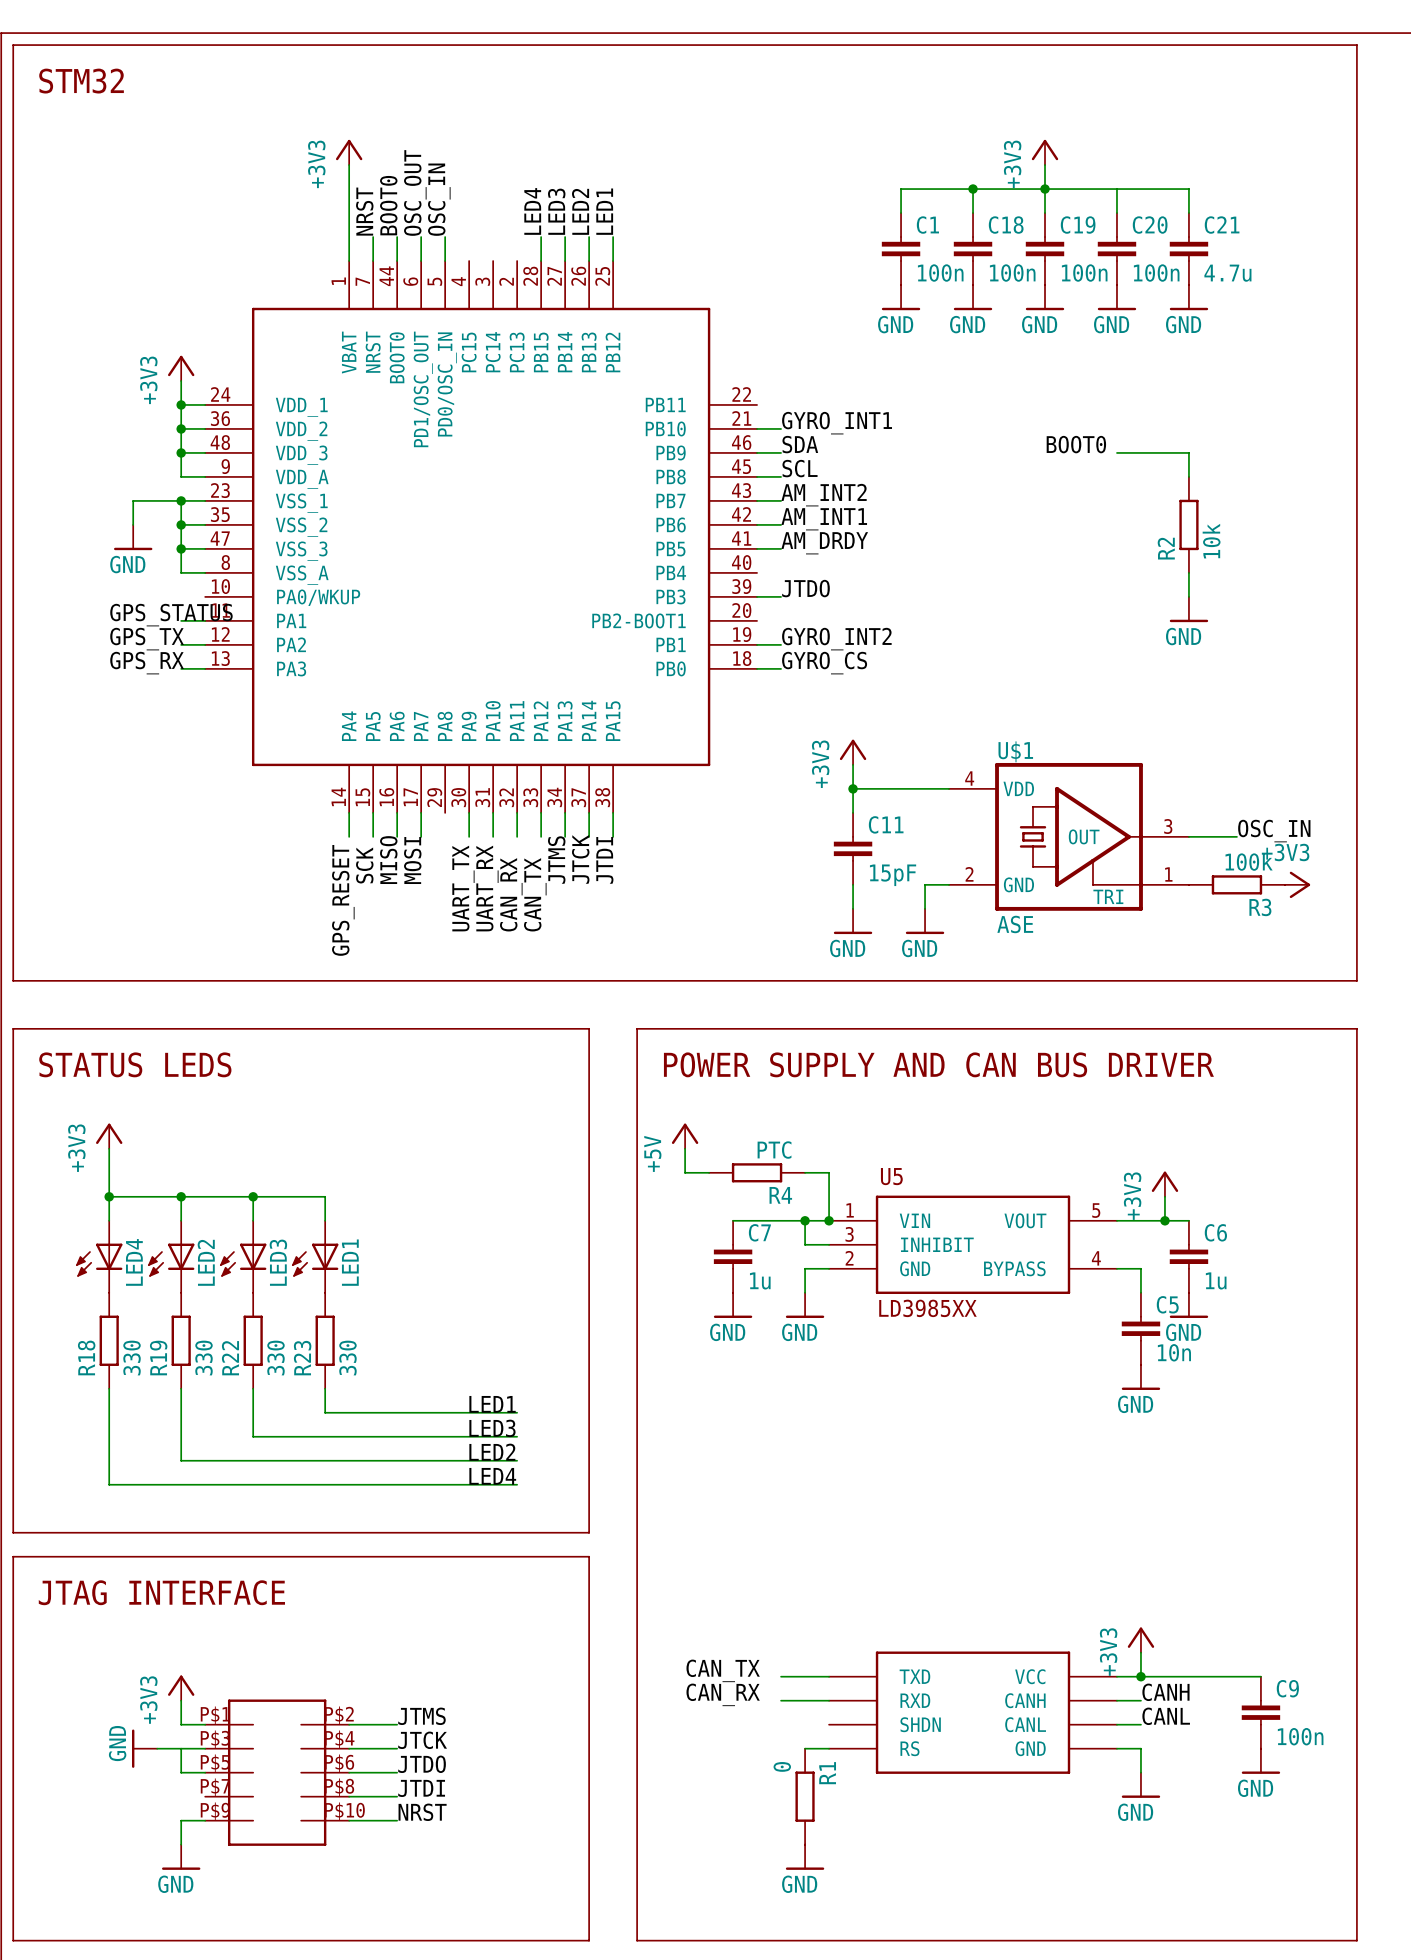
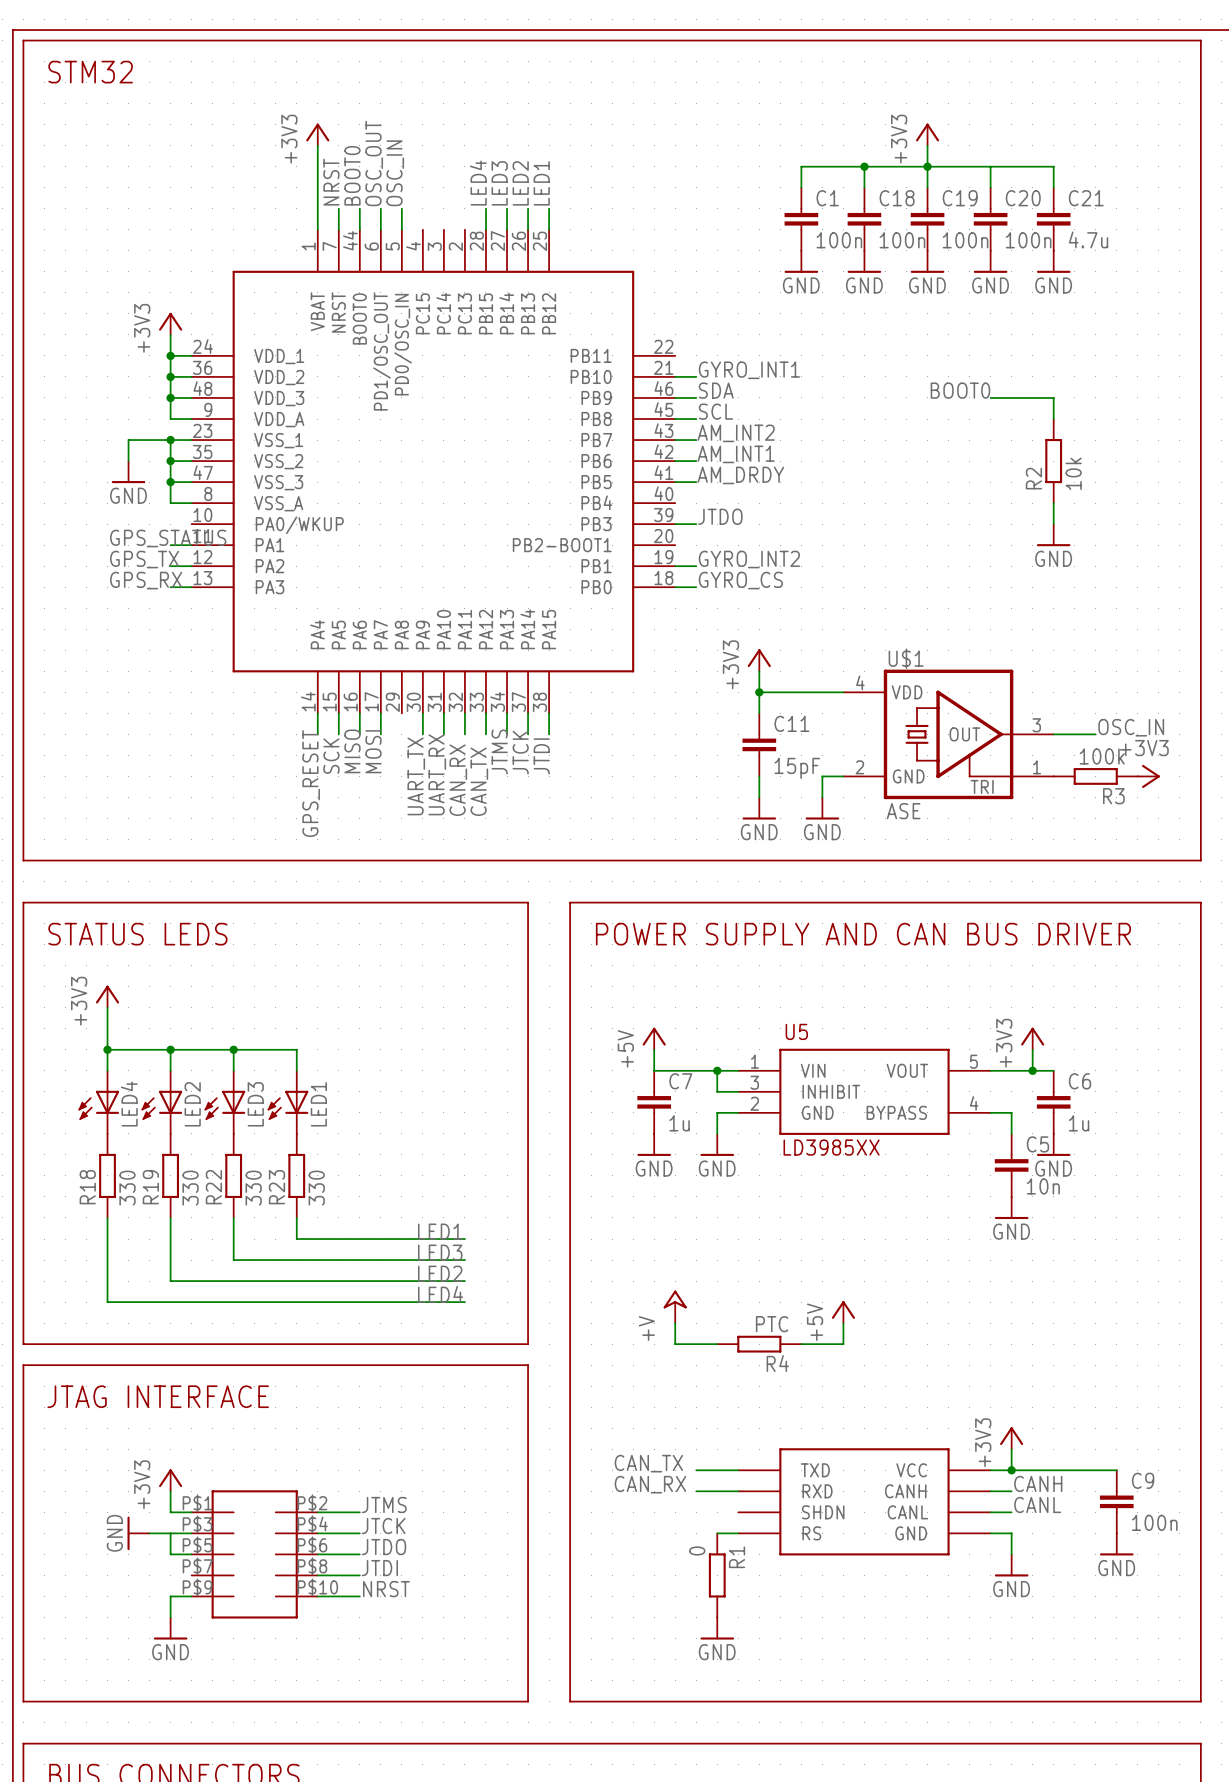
power symbol position: +5V (685, 1136) -> +5V (654, 1038)
wire: (685, 1148) (685, 1172) (709, 1172) -> none
R4 position: (757, 1172) -> (759, 1344)
wire: (805, 1172) (829, 1172) (829, 1220) -> none
wire: none -> (654, 1049) (654, 1070)
junction: (829, 1220) -> none
power symbol: none -> +V (675, 1306)
power symbol: none -> +5V (843, 1312)
wire: none -> (675, 1323) (675, 1344) (717, 1344)
wire: none -> (843, 1323) (843, 1344) (801, 1344)

